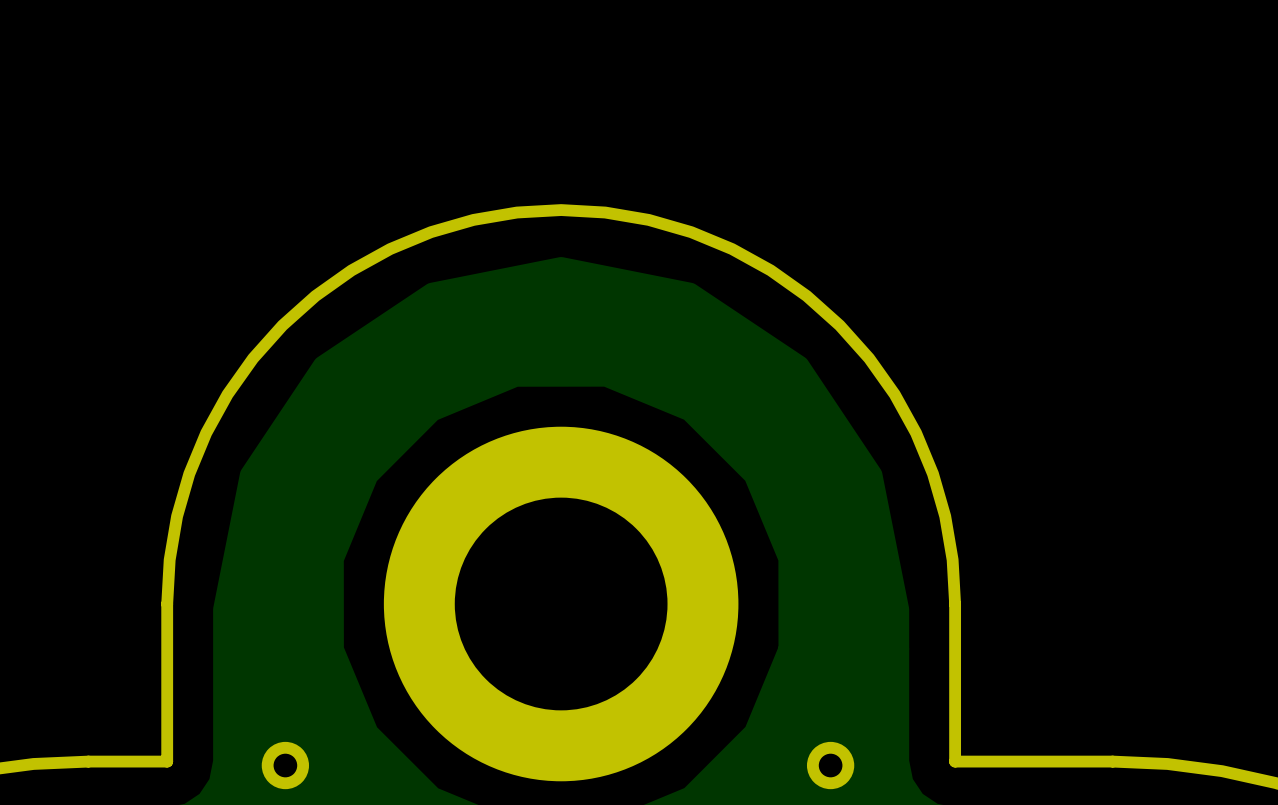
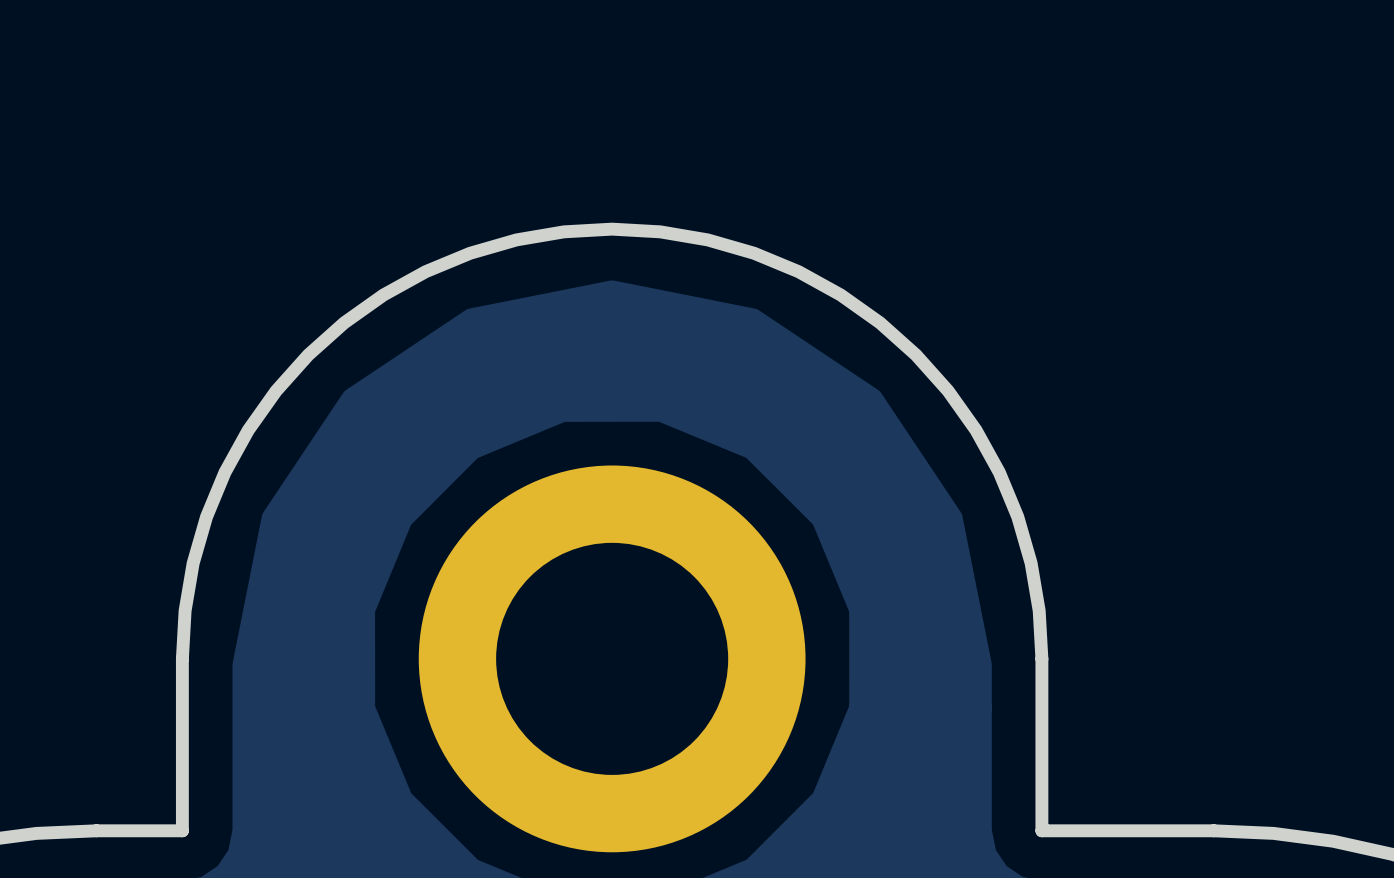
part: (285, 765) -> none
part: (830, 765) -> none

